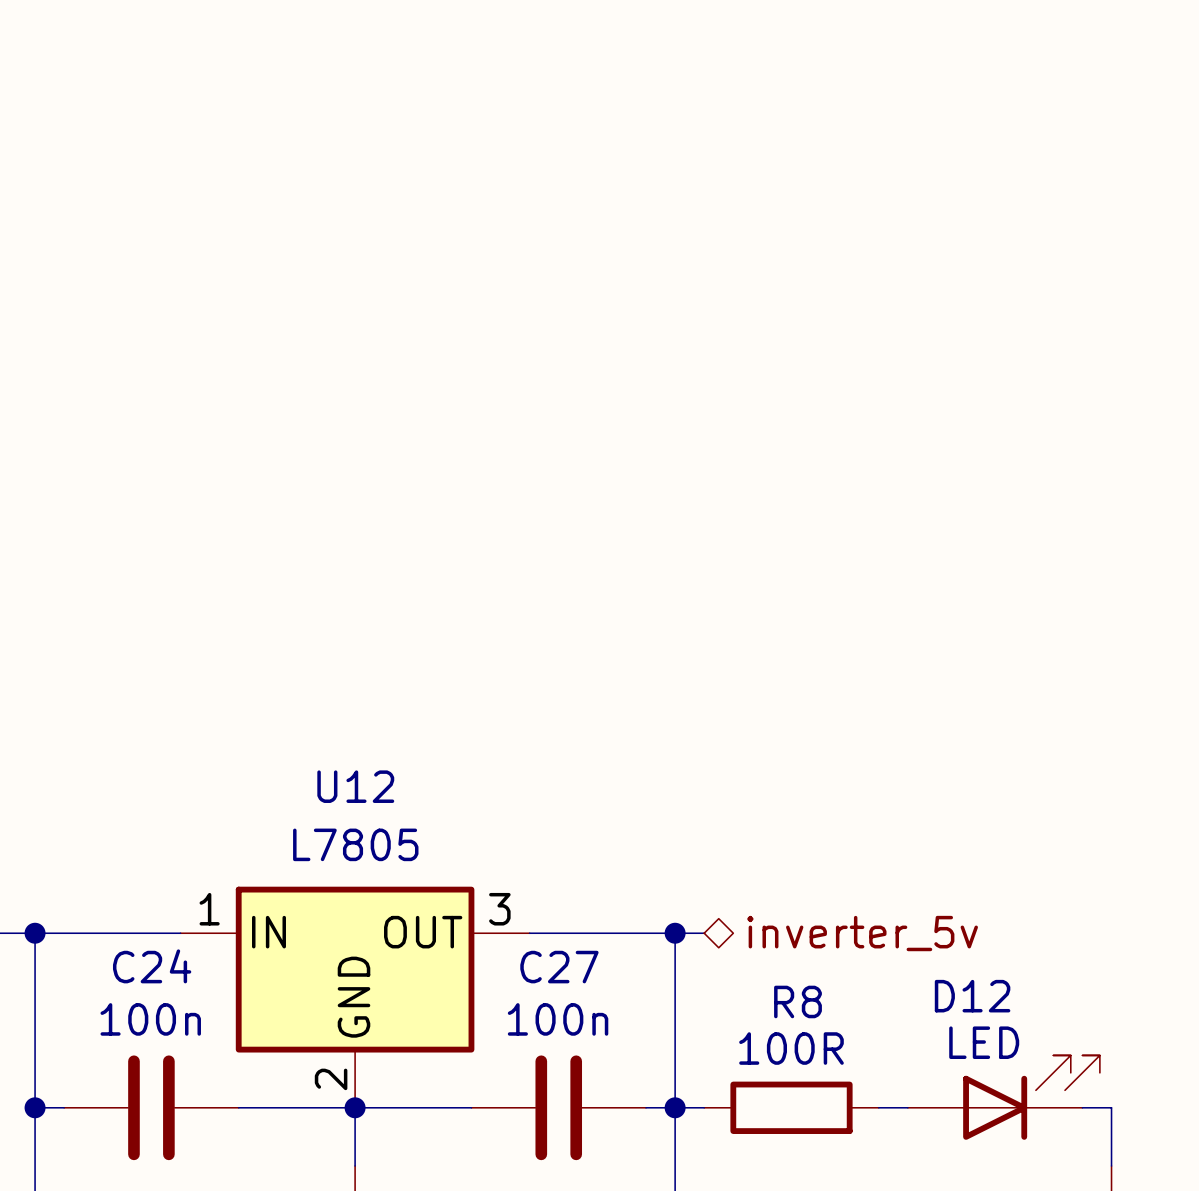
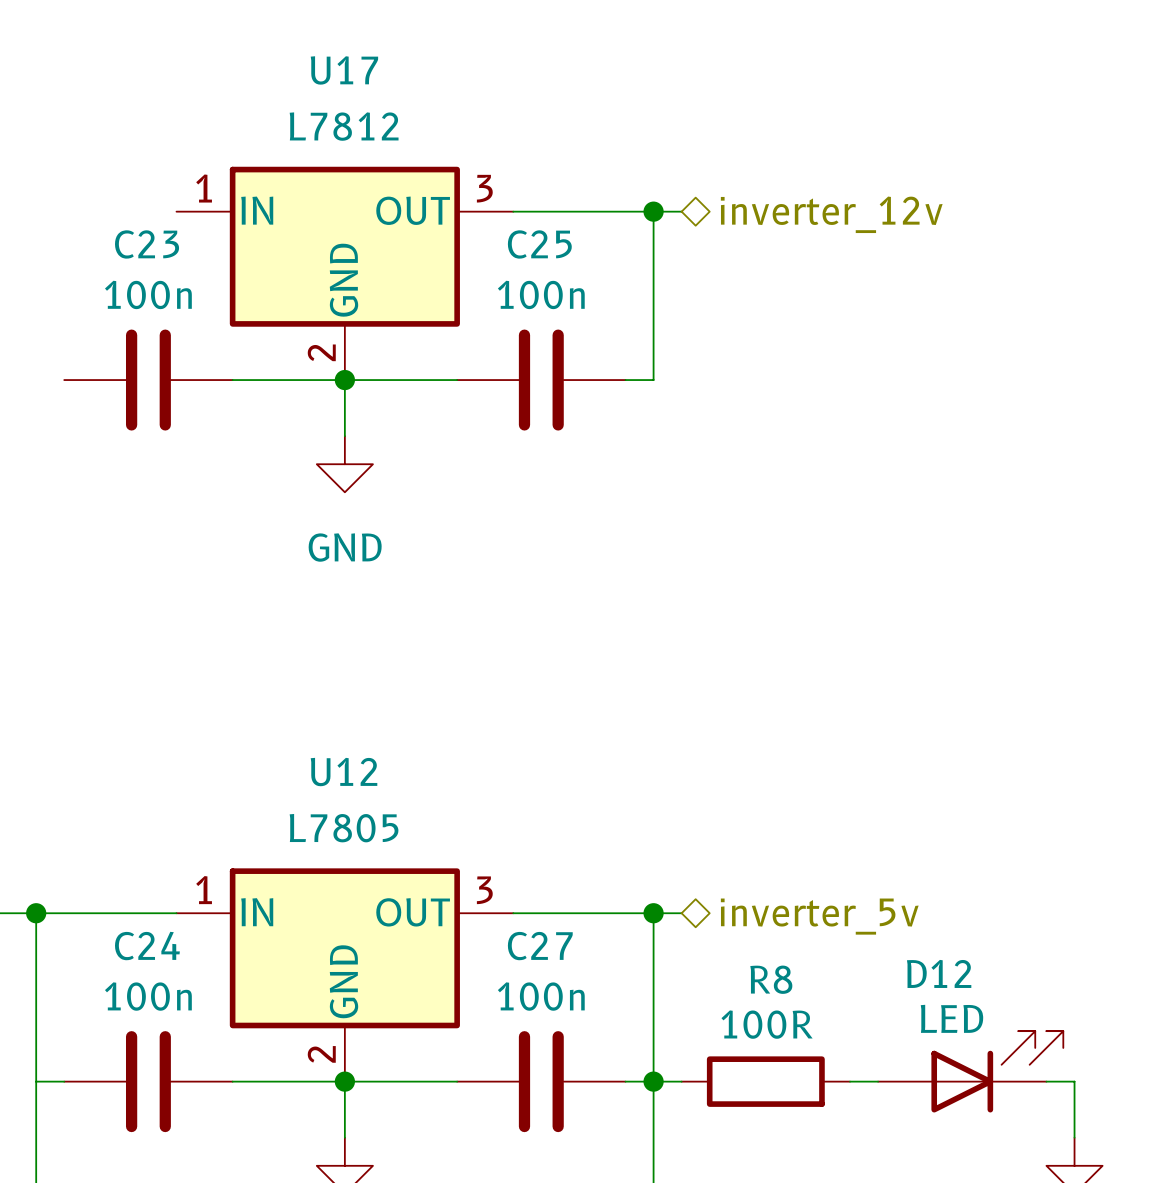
wire: none -> (513, 211) (681, 211)
wire: none -> (653, 211) (653, 380) (625, 380)
junction: none -> (653, 211)
hierarchical label: none -> inverter_12v (831, 214)
U17: none -> L7812 (344, 273)
C23: none -> 100n (148, 380)
wire: none -> (232, 380) (457, 380)
wire: none -> (344, 380) (344, 436)
junction: none -> (344, 380)
C25: none -> 100n (541, 380)
power symbol: none -> GND (344, 464)
junction: (35, 1107) -> none

